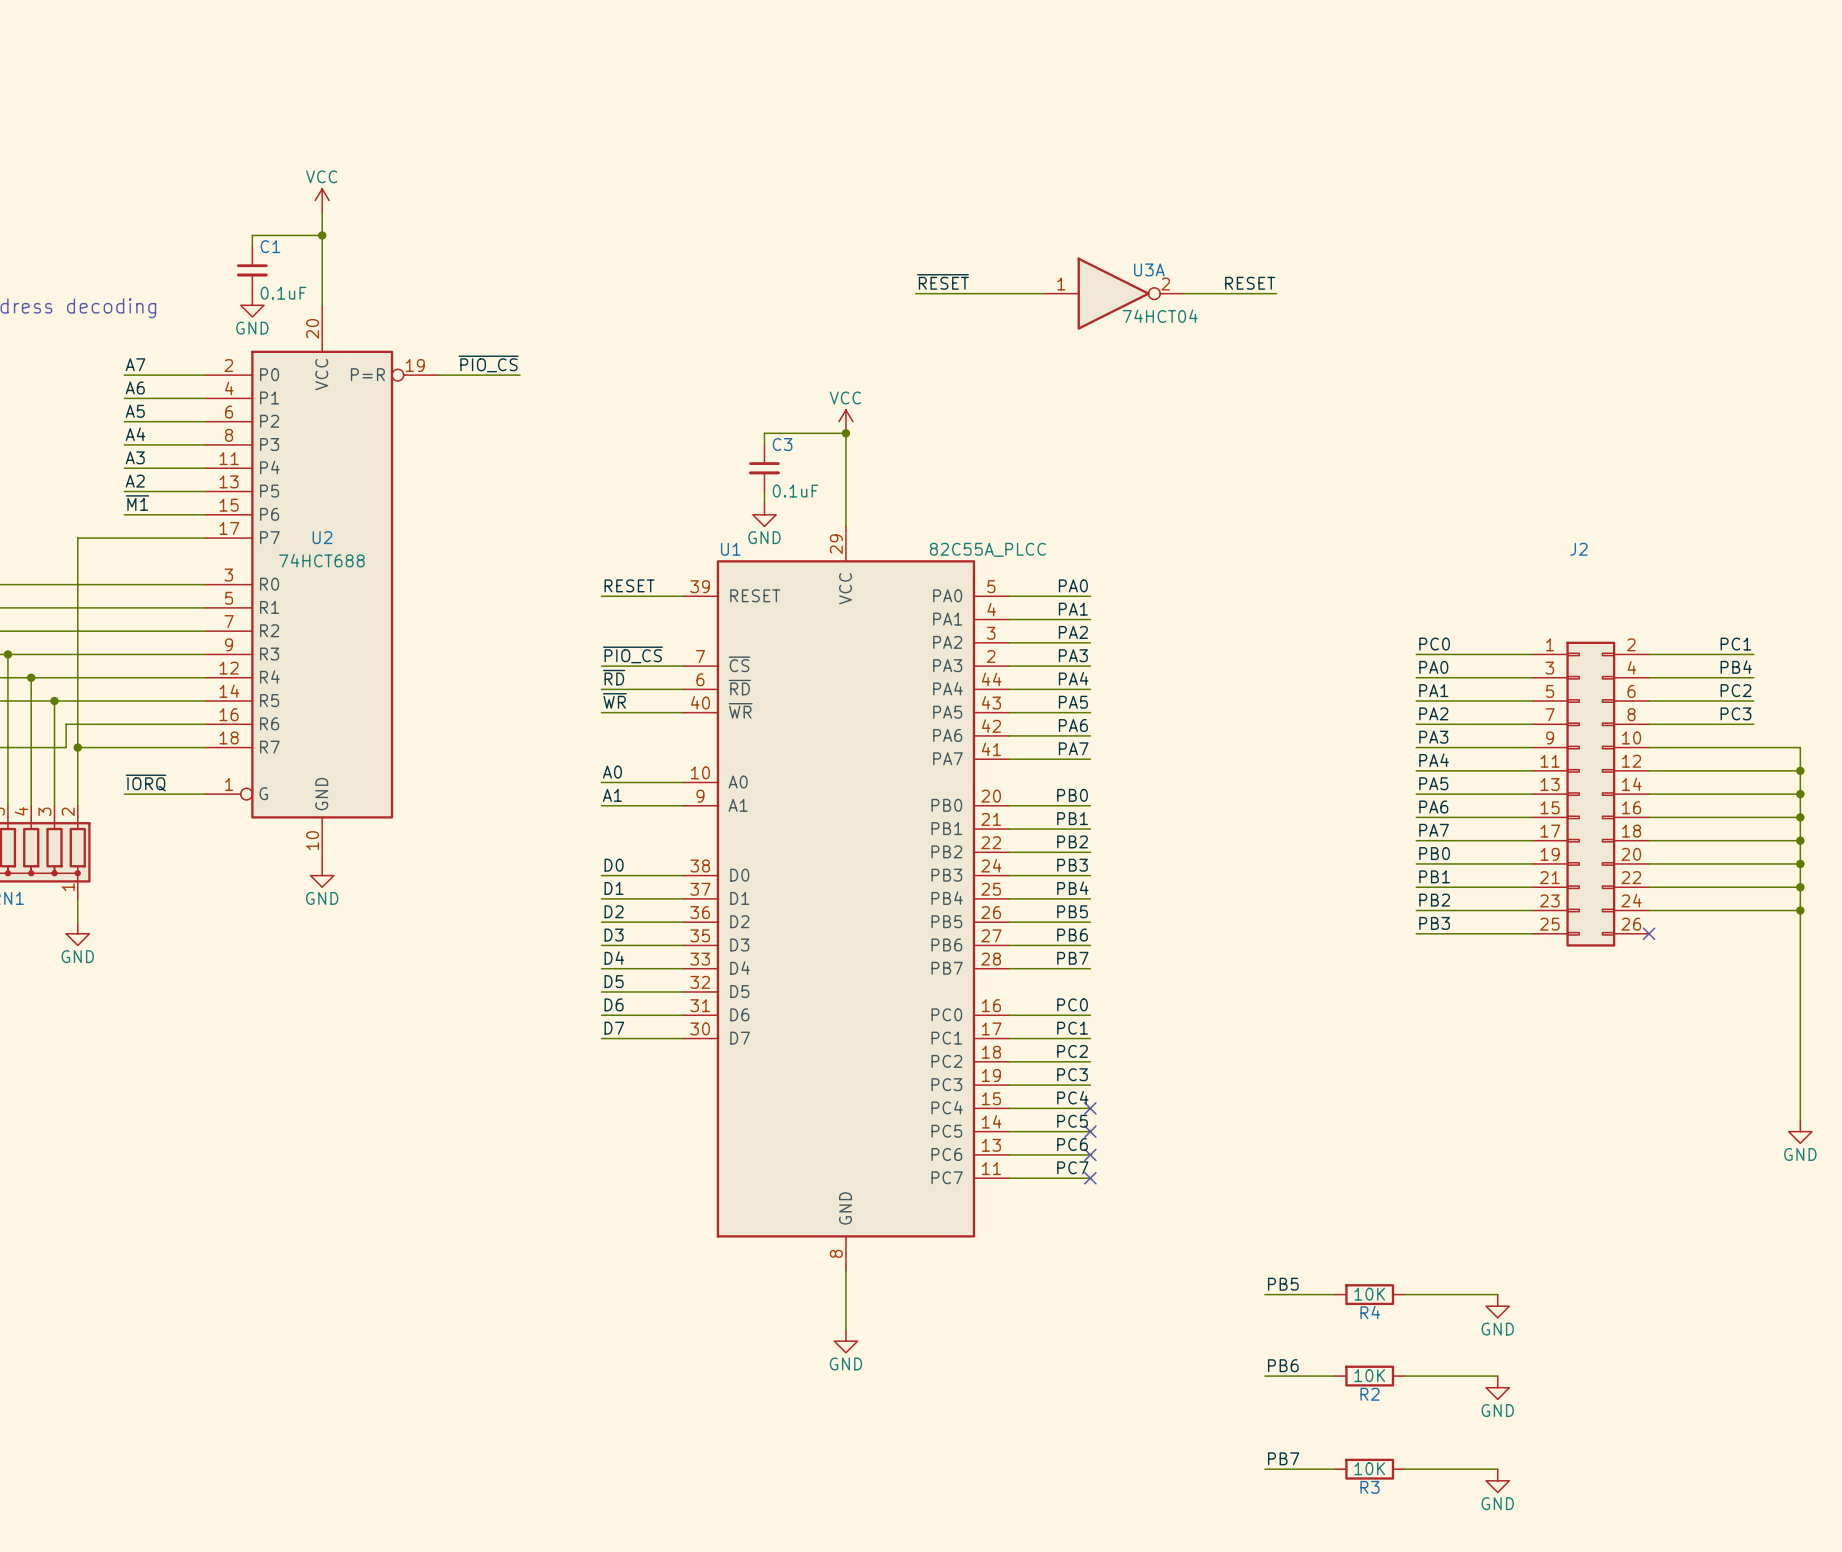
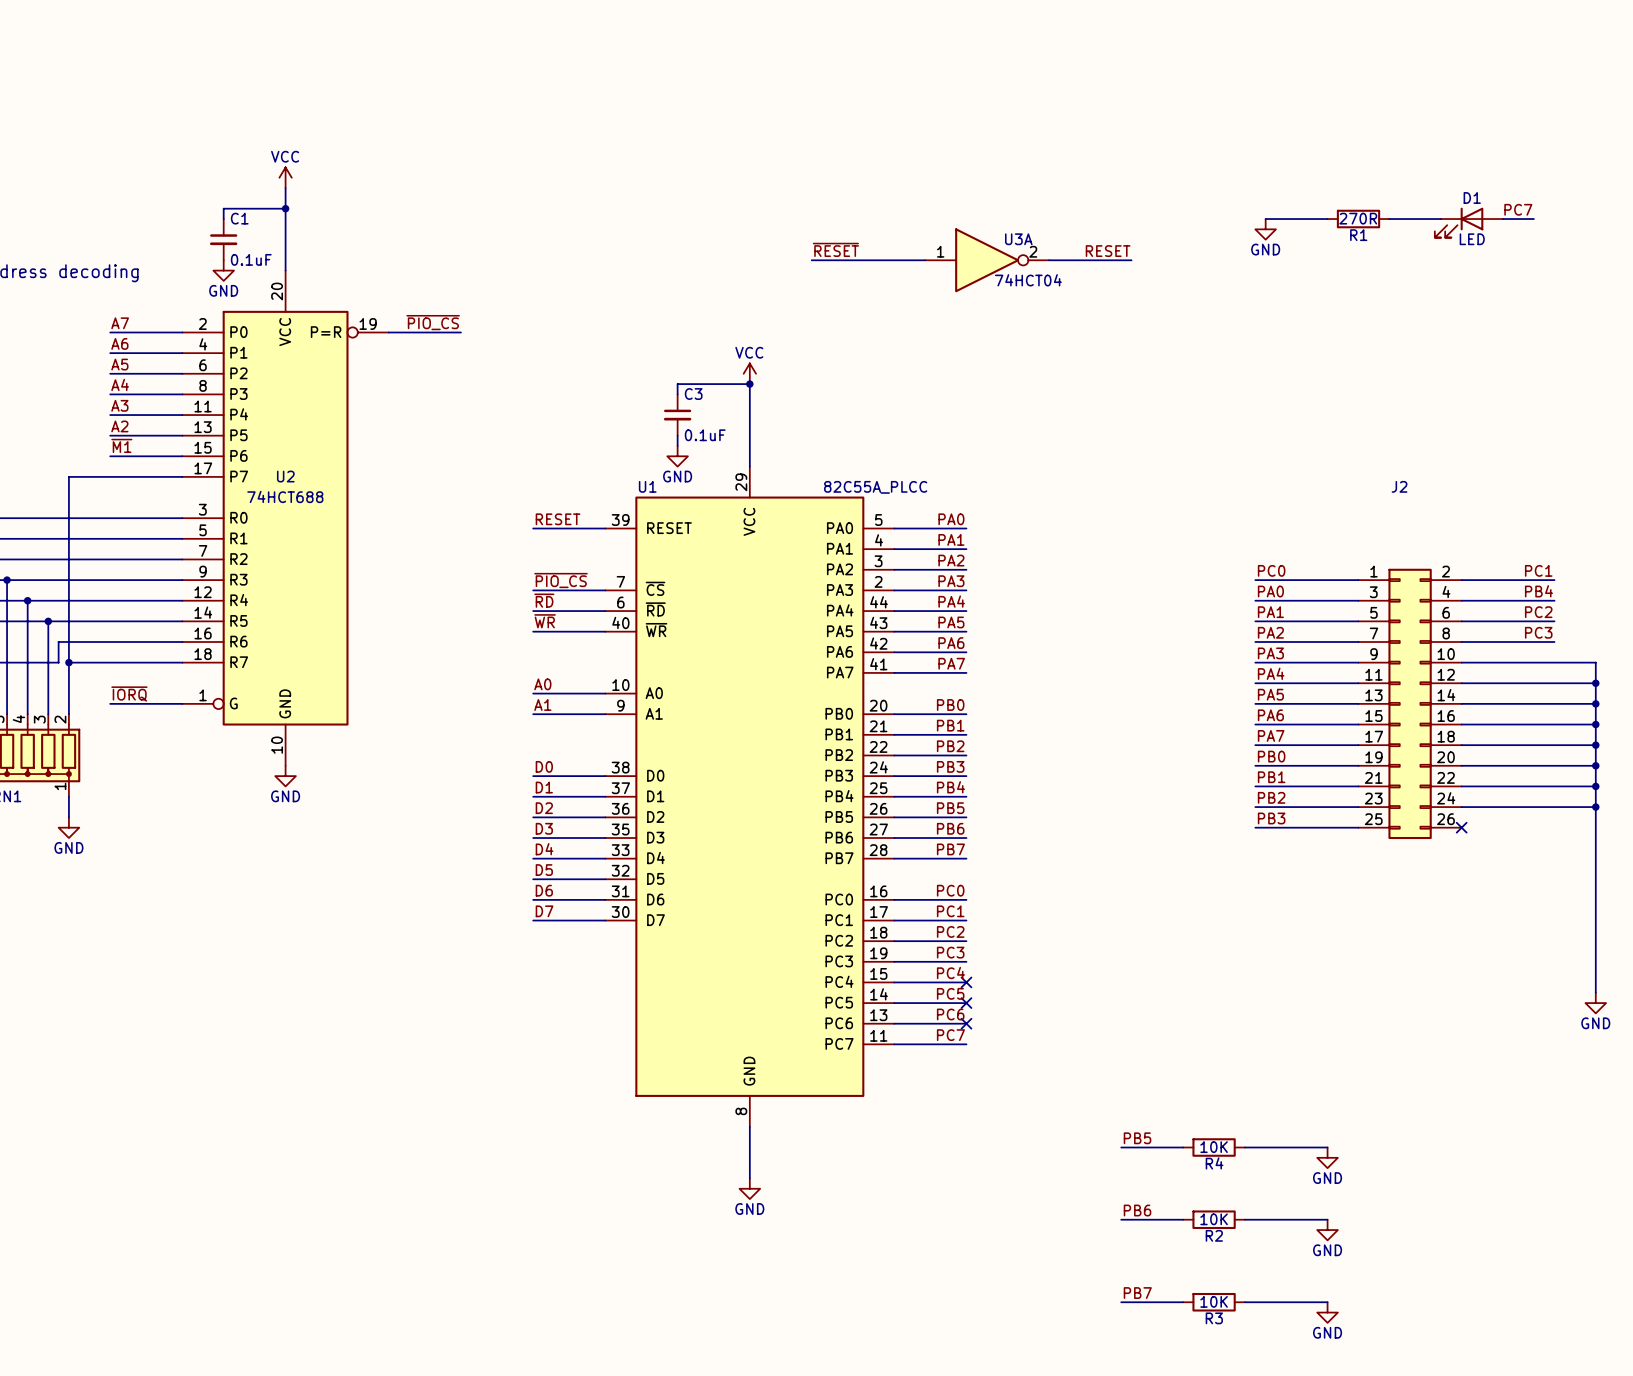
label: none -> PC7 (1518, 209)
wire: none -> (1265, 219) (1327, 219)
R1: none -> 270R (1358, 219)
wire: none -> (1389, 219) (1441, 219)
wire: none -> (1502, 219) (1533, 219)
D1: none -> LED (1468, 222)
power symbol: none -> GND (1265, 229)
no-connect mark: (1090, 1178) -> none

